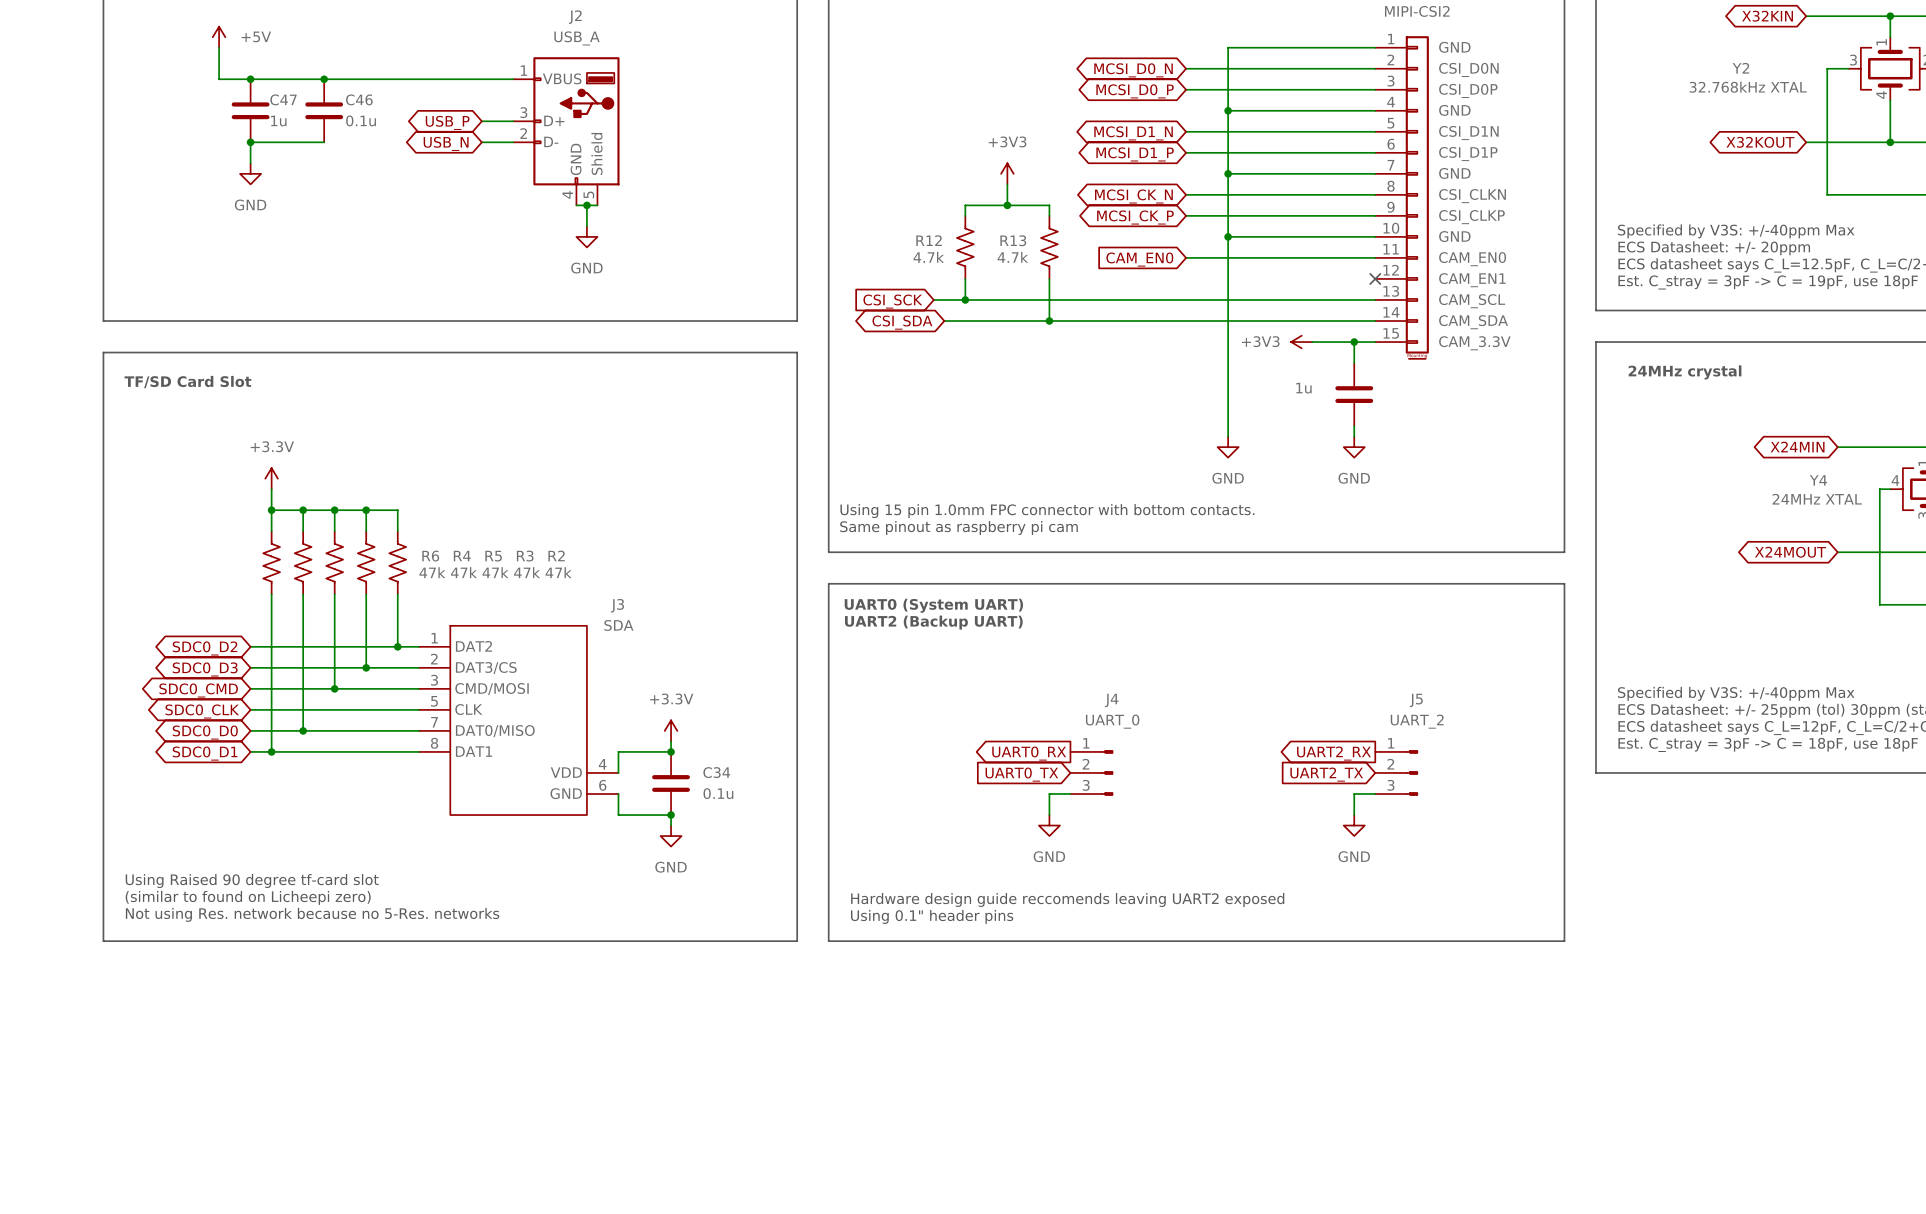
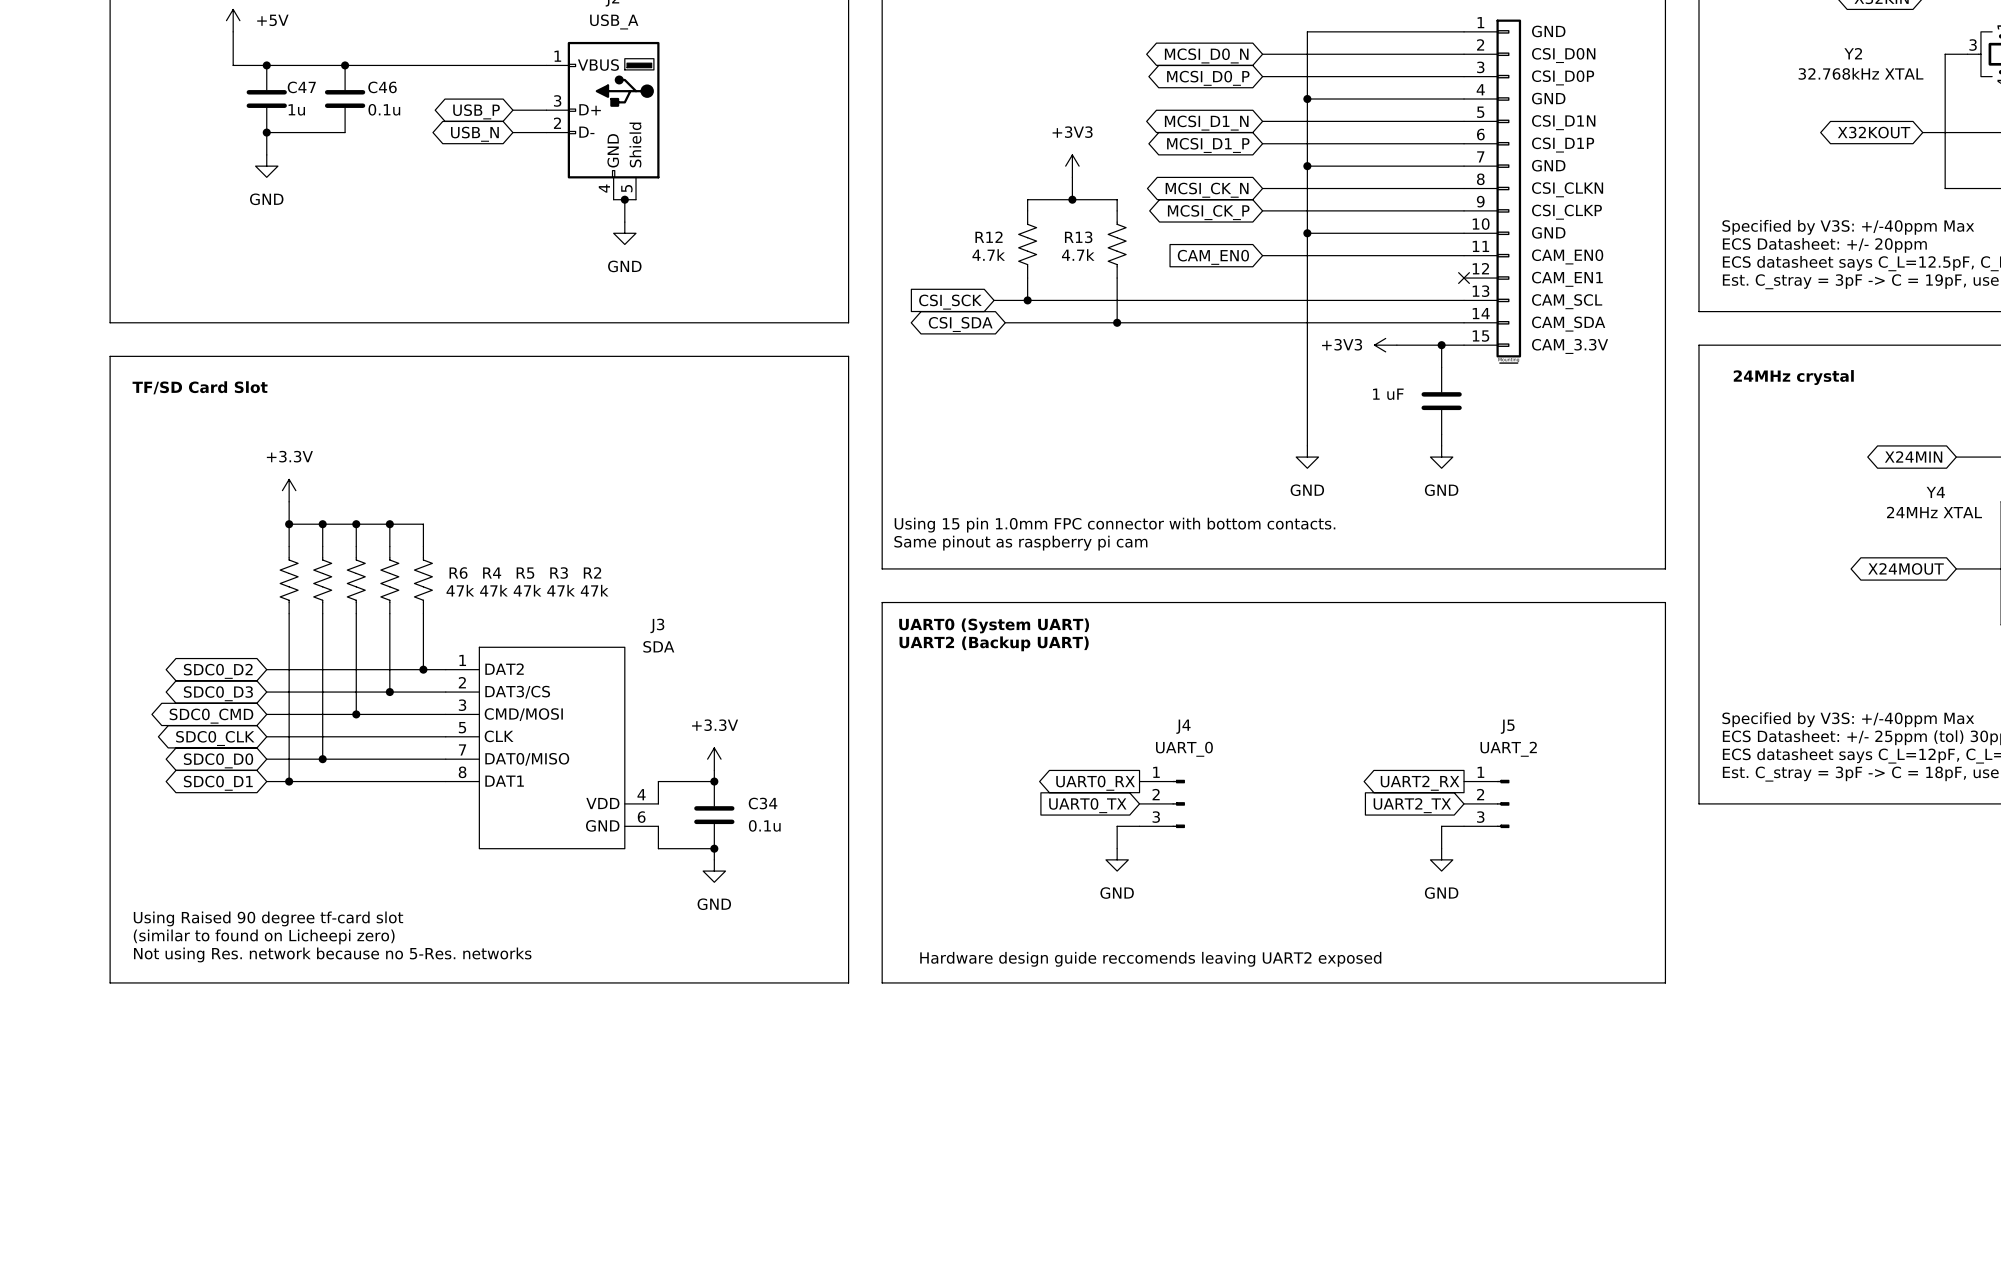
part value: 1u (1303, 388) -> 1 uF (1388, 394)
text: Hardware design guide reccomends leaving UART2 exposed (1067, 899) -> none
text: Using 0.1" header pins (932, 916) -> none
text: none -> Hardware design guide reccomends leaving UART2 exposed (1150, 959)

